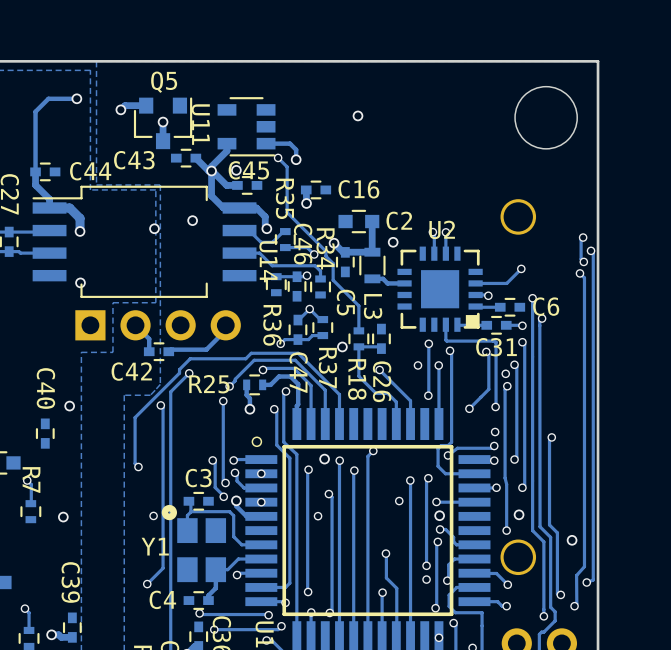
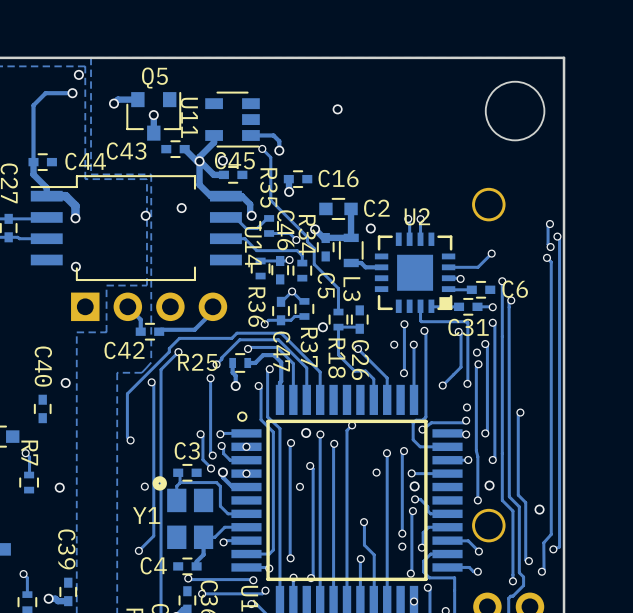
via: none -> (78, 74)

